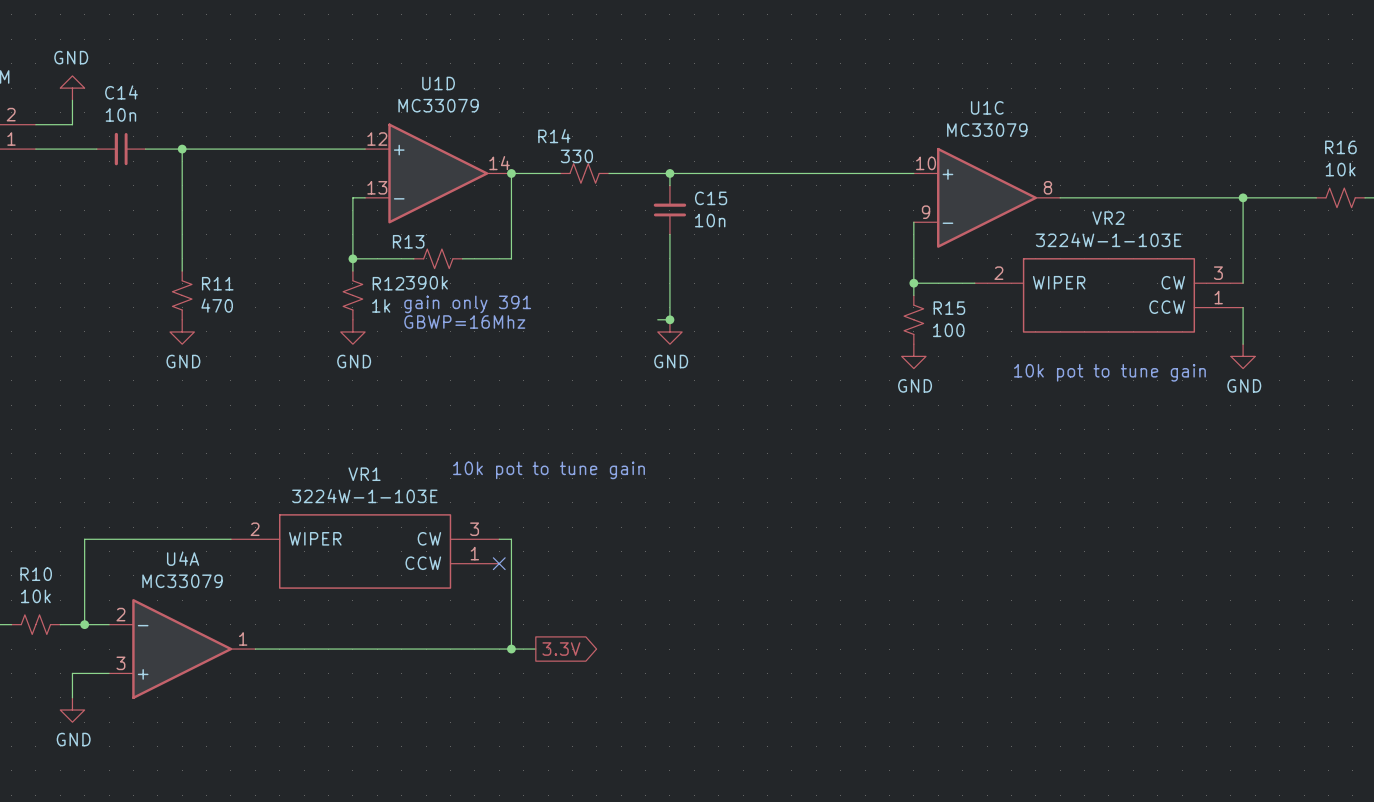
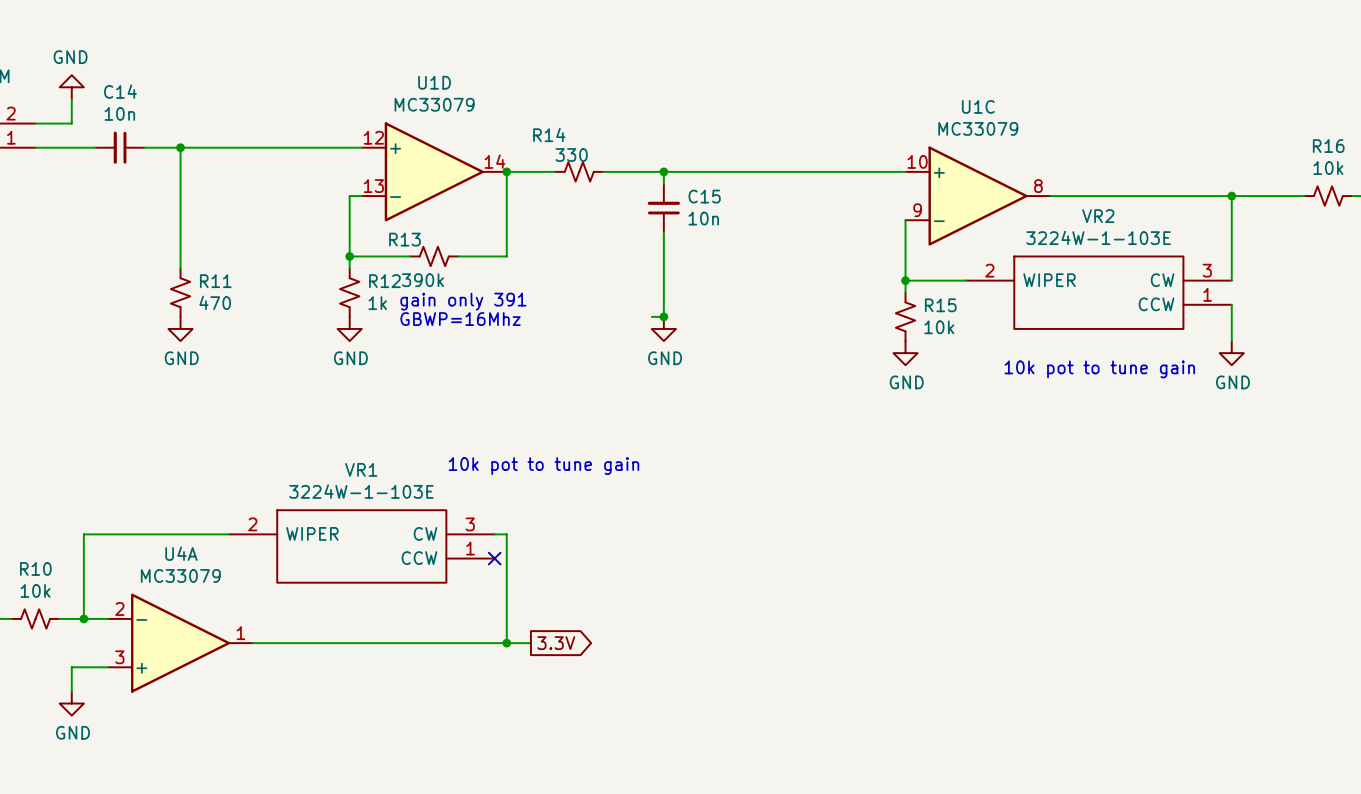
R15 value: 100 (948, 330) -> 10k (939, 327)

